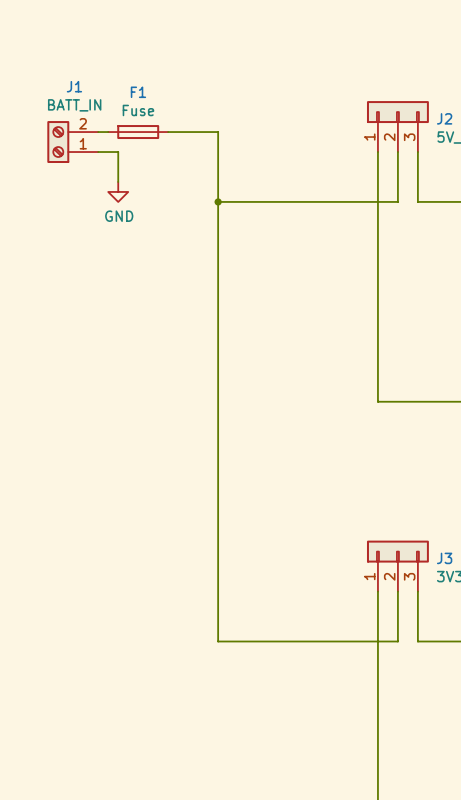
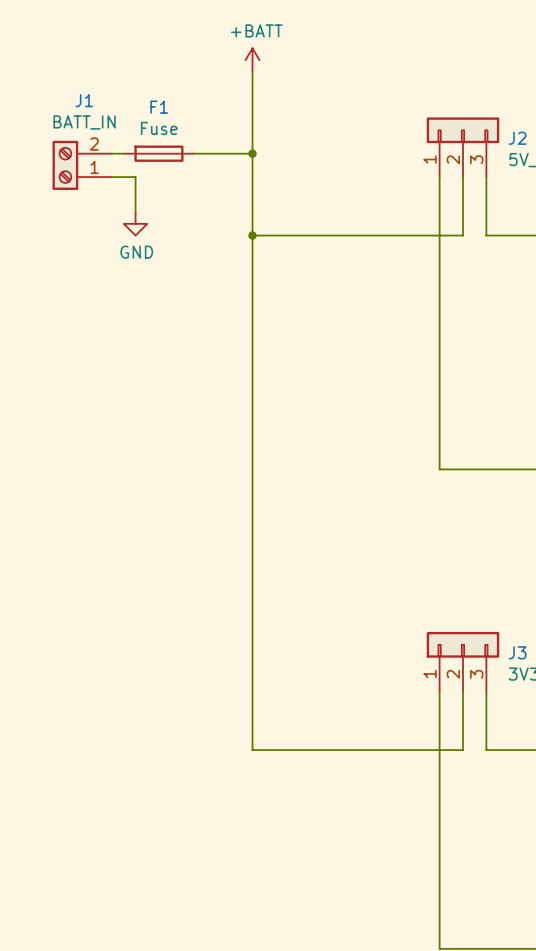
power symbol: none -> +BATT (252, 60)
wire: none -> (252, 71) (252, 153)
junction: none -> (252, 153)

